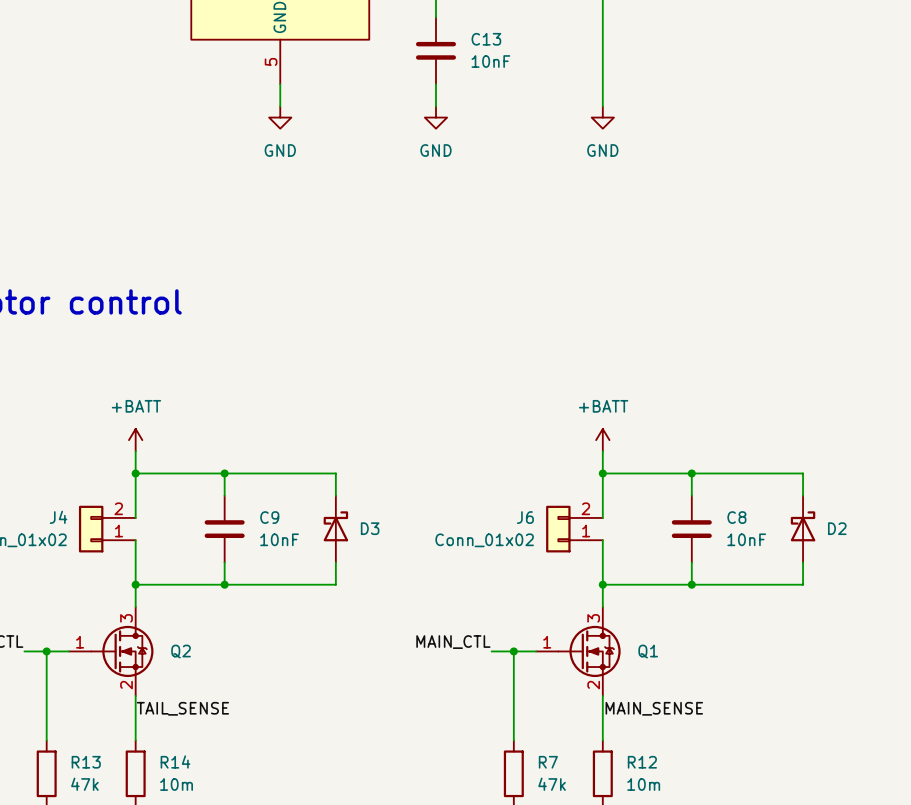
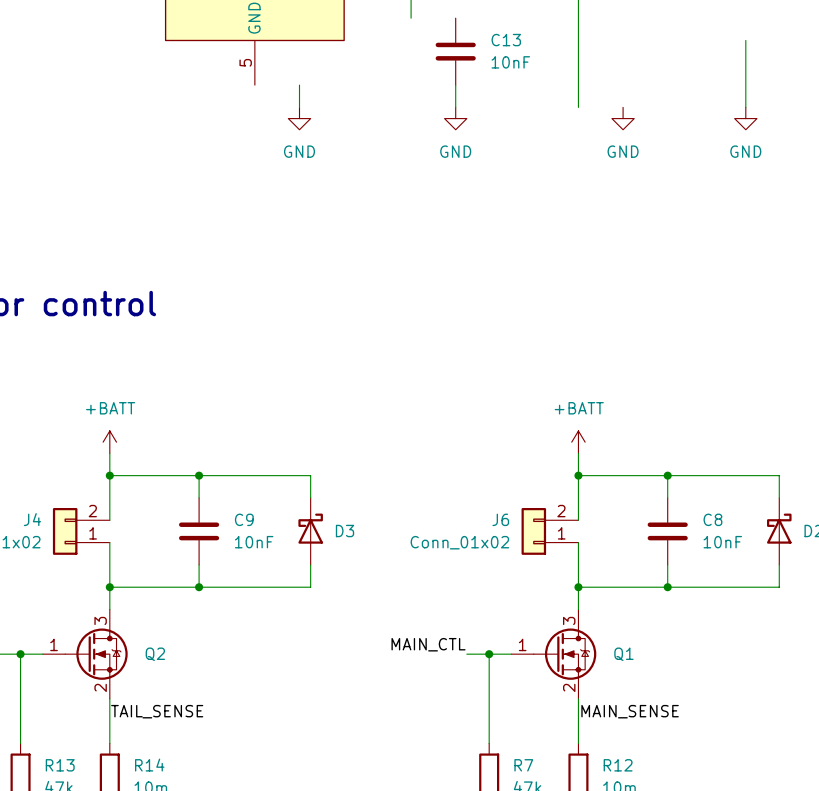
wire: none -> (745, 40) (745, 107)
C13 position: (435, 50) -> (455, 51)
wire: (280, 84) (280, 106) -> (299, 85) (299, 107)
wire: (435, 84) (435, 106) -> (455, 85) (455, 107)
power symbol position: GND (280, 117) -> GND (299, 118)
power symbol position: GND (435, 117) -> GND (455, 118)
power symbol position: GND (602, 117) -> GND (623, 118)
power symbol: none -> GND (745, 118)

